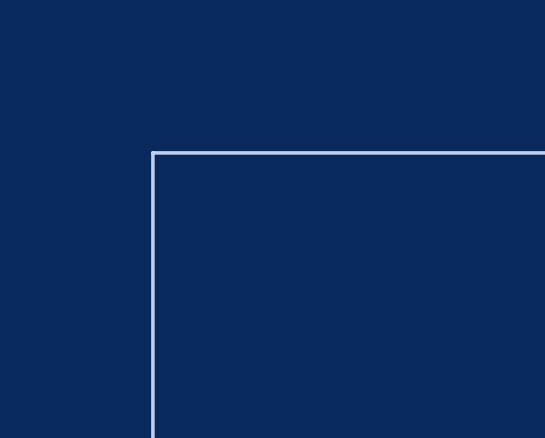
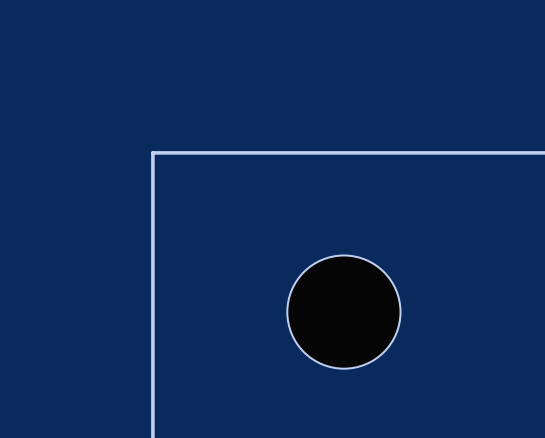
part: none -> (343, 312)

